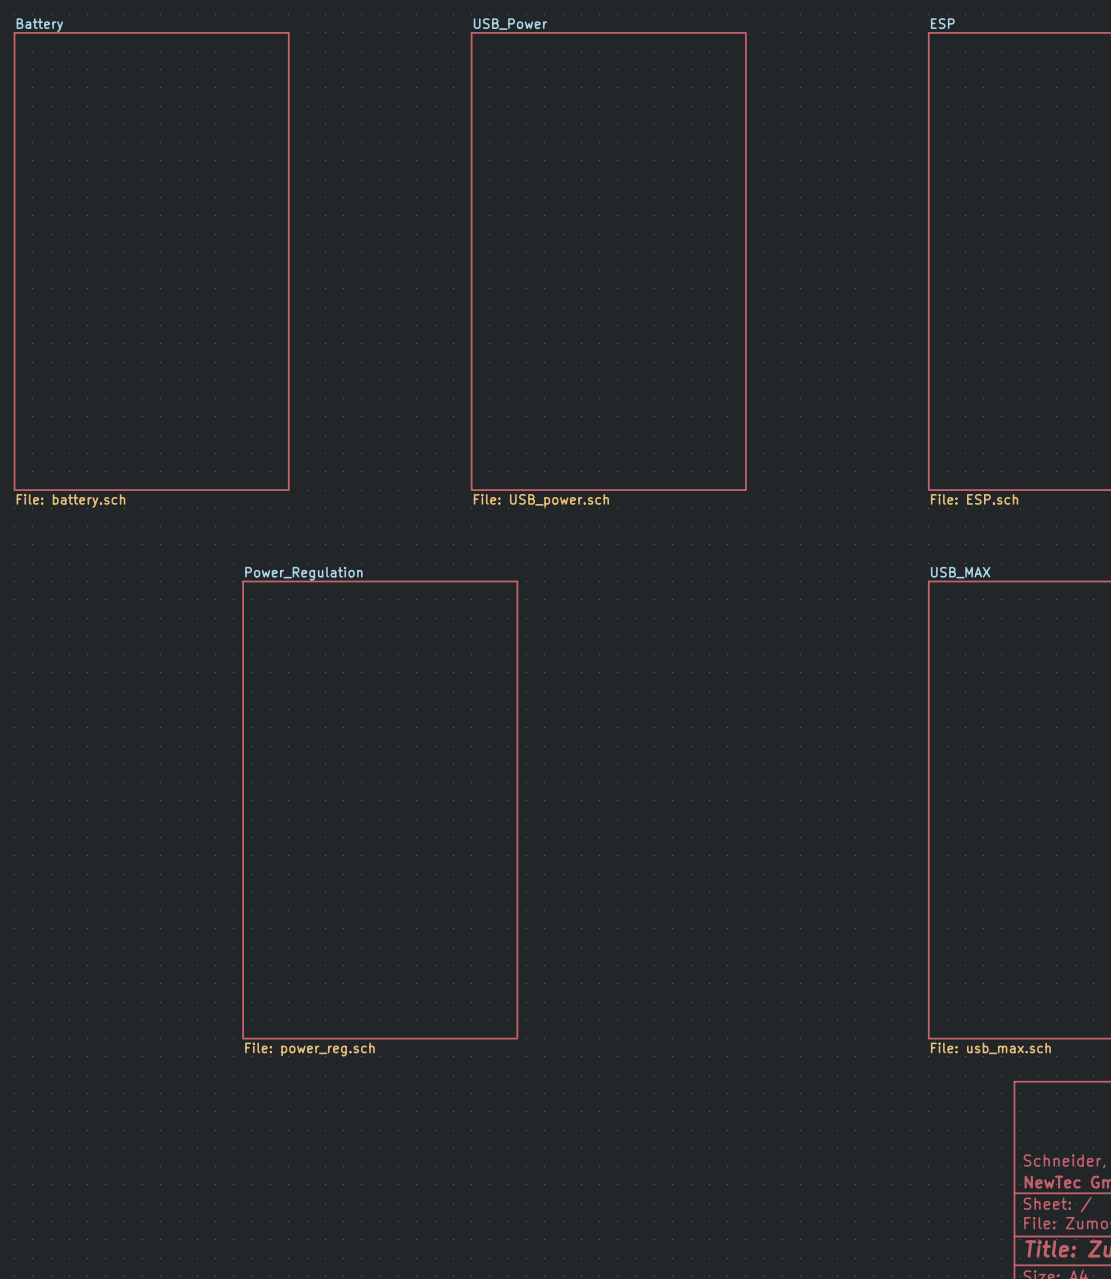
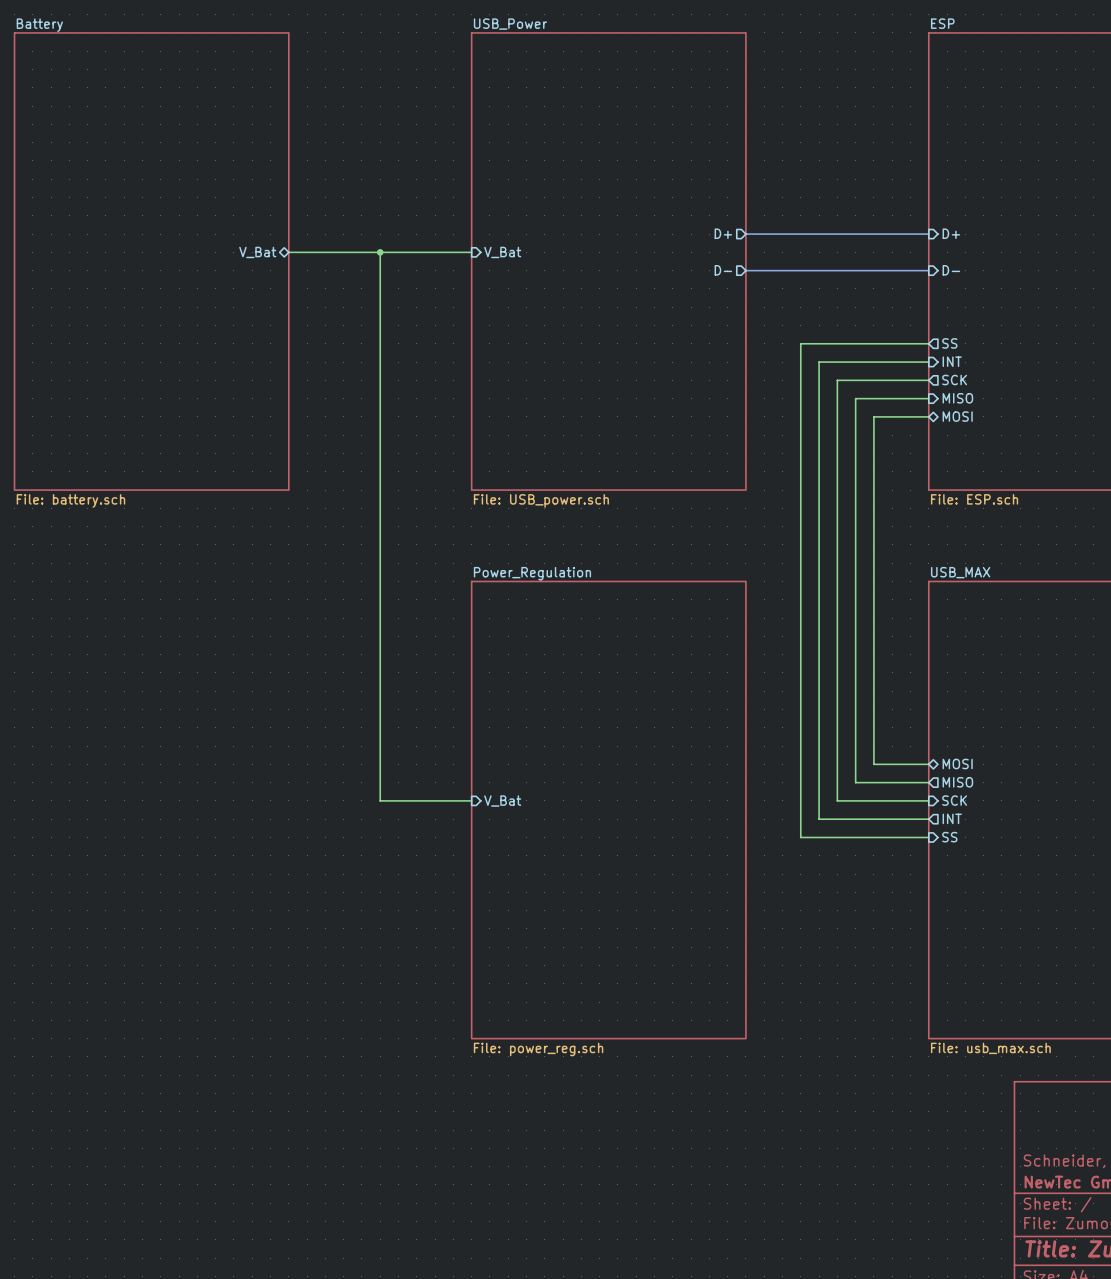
sheet pin: none -> D+ (723, 233)
sheet pin: none -> D+ (951, 233)
bus: none -> (745, 234) (928, 234)
sheet pin: none -> V_Bat (257, 252)
wire: none -> (288, 252) (471, 252)
wire: none -> (380, 252) (380, 800) (471, 800)
junction: none -> (380, 252)
sheet pin: none -> V_Bat (502, 252)
sheet pin: none -> D- (723, 270)
bus: none -> (745, 270) (928, 270)
sheet pin: none -> D- (951, 270)
wire: none -> (928, 343) (800, 343) (800, 837) (928, 837)
sheet pin: none -> SS (949, 343)
sheet pin: none -> INT (952, 361)
wire: none -> (928, 362) (819, 362) (819, 819) (928, 819)
wire: none -> (928, 380) (837, 380) (837, 800) (928, 800)
sheet pin: none -> SCK (954, 380)
wire: none -> (928, 398) (855, 398) (855, 782) (928, 782)
sheet pin: none -> MISO (957, 398)
wire: none -> (928, 416) (873, 416) (873, 764) (928, 764)
sheet pin: none -> MOSI (957, 416)
sheet pin: none -> MOSI (957, 764)
sheet pin: none -> MISO (957, 782)
sheet pin: none -> SCK (954, 800)
sheet pin: none -> V_Bat (502, 801)
sheet Power_Regulation: File: power_reg.sch (380, 810) -> none
sheet Power_Regulation: none -> File: power_reg.sch (608, 810)
sheet pin: none -> INT (952, 818)
sheet pin: none -> SS (949, 837)

